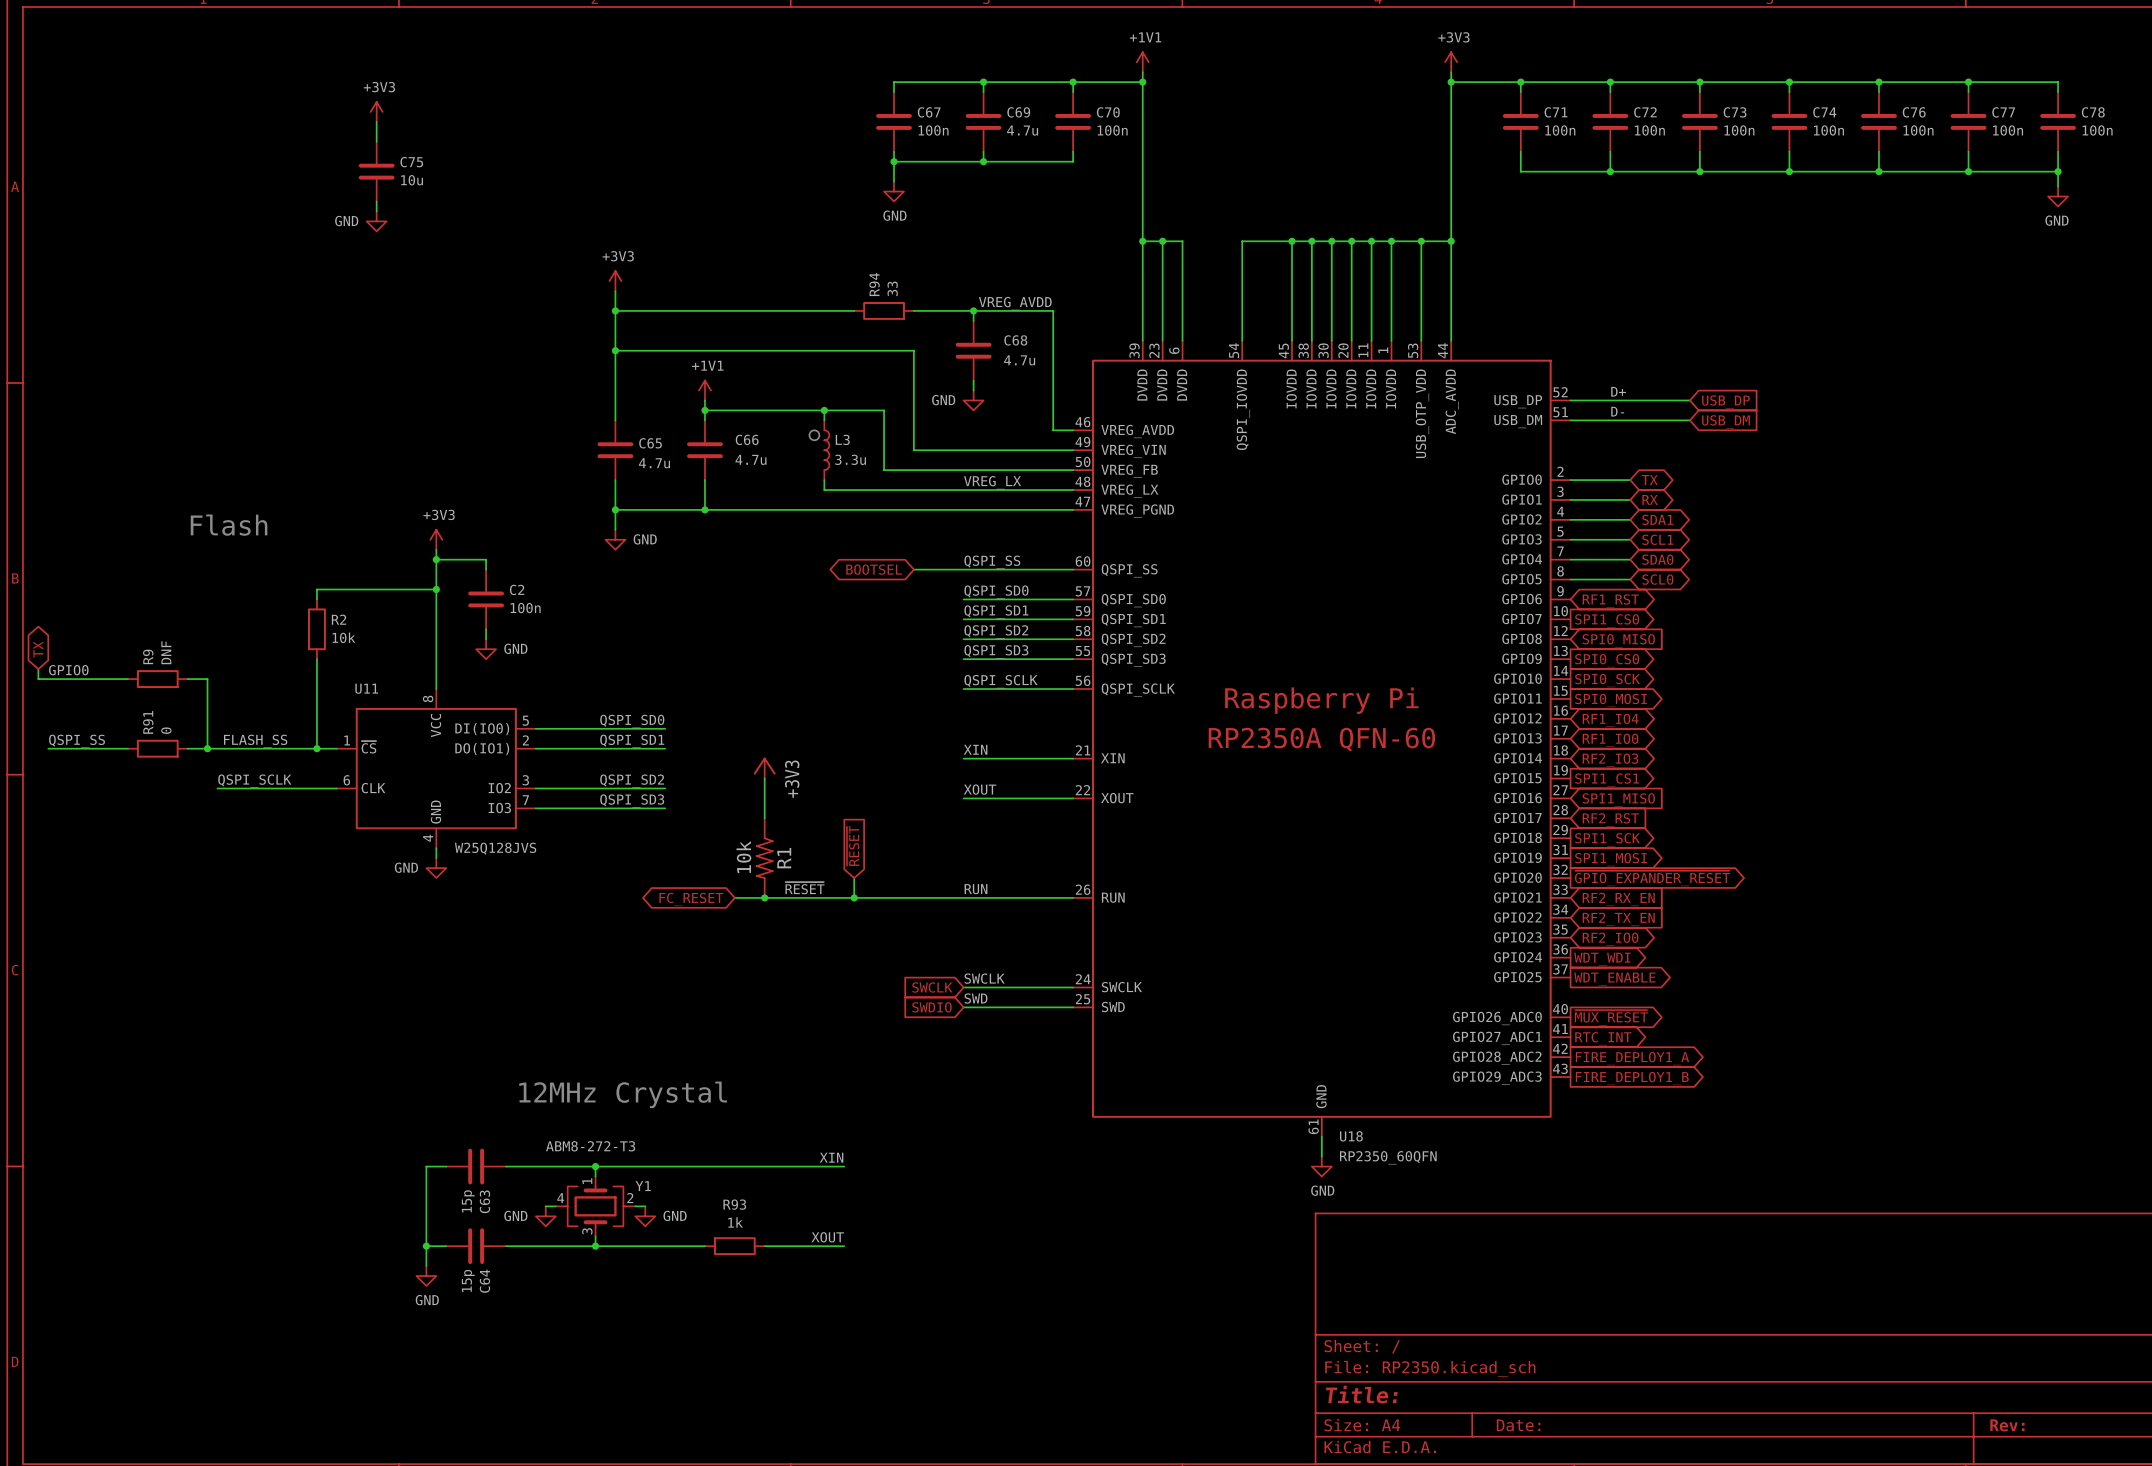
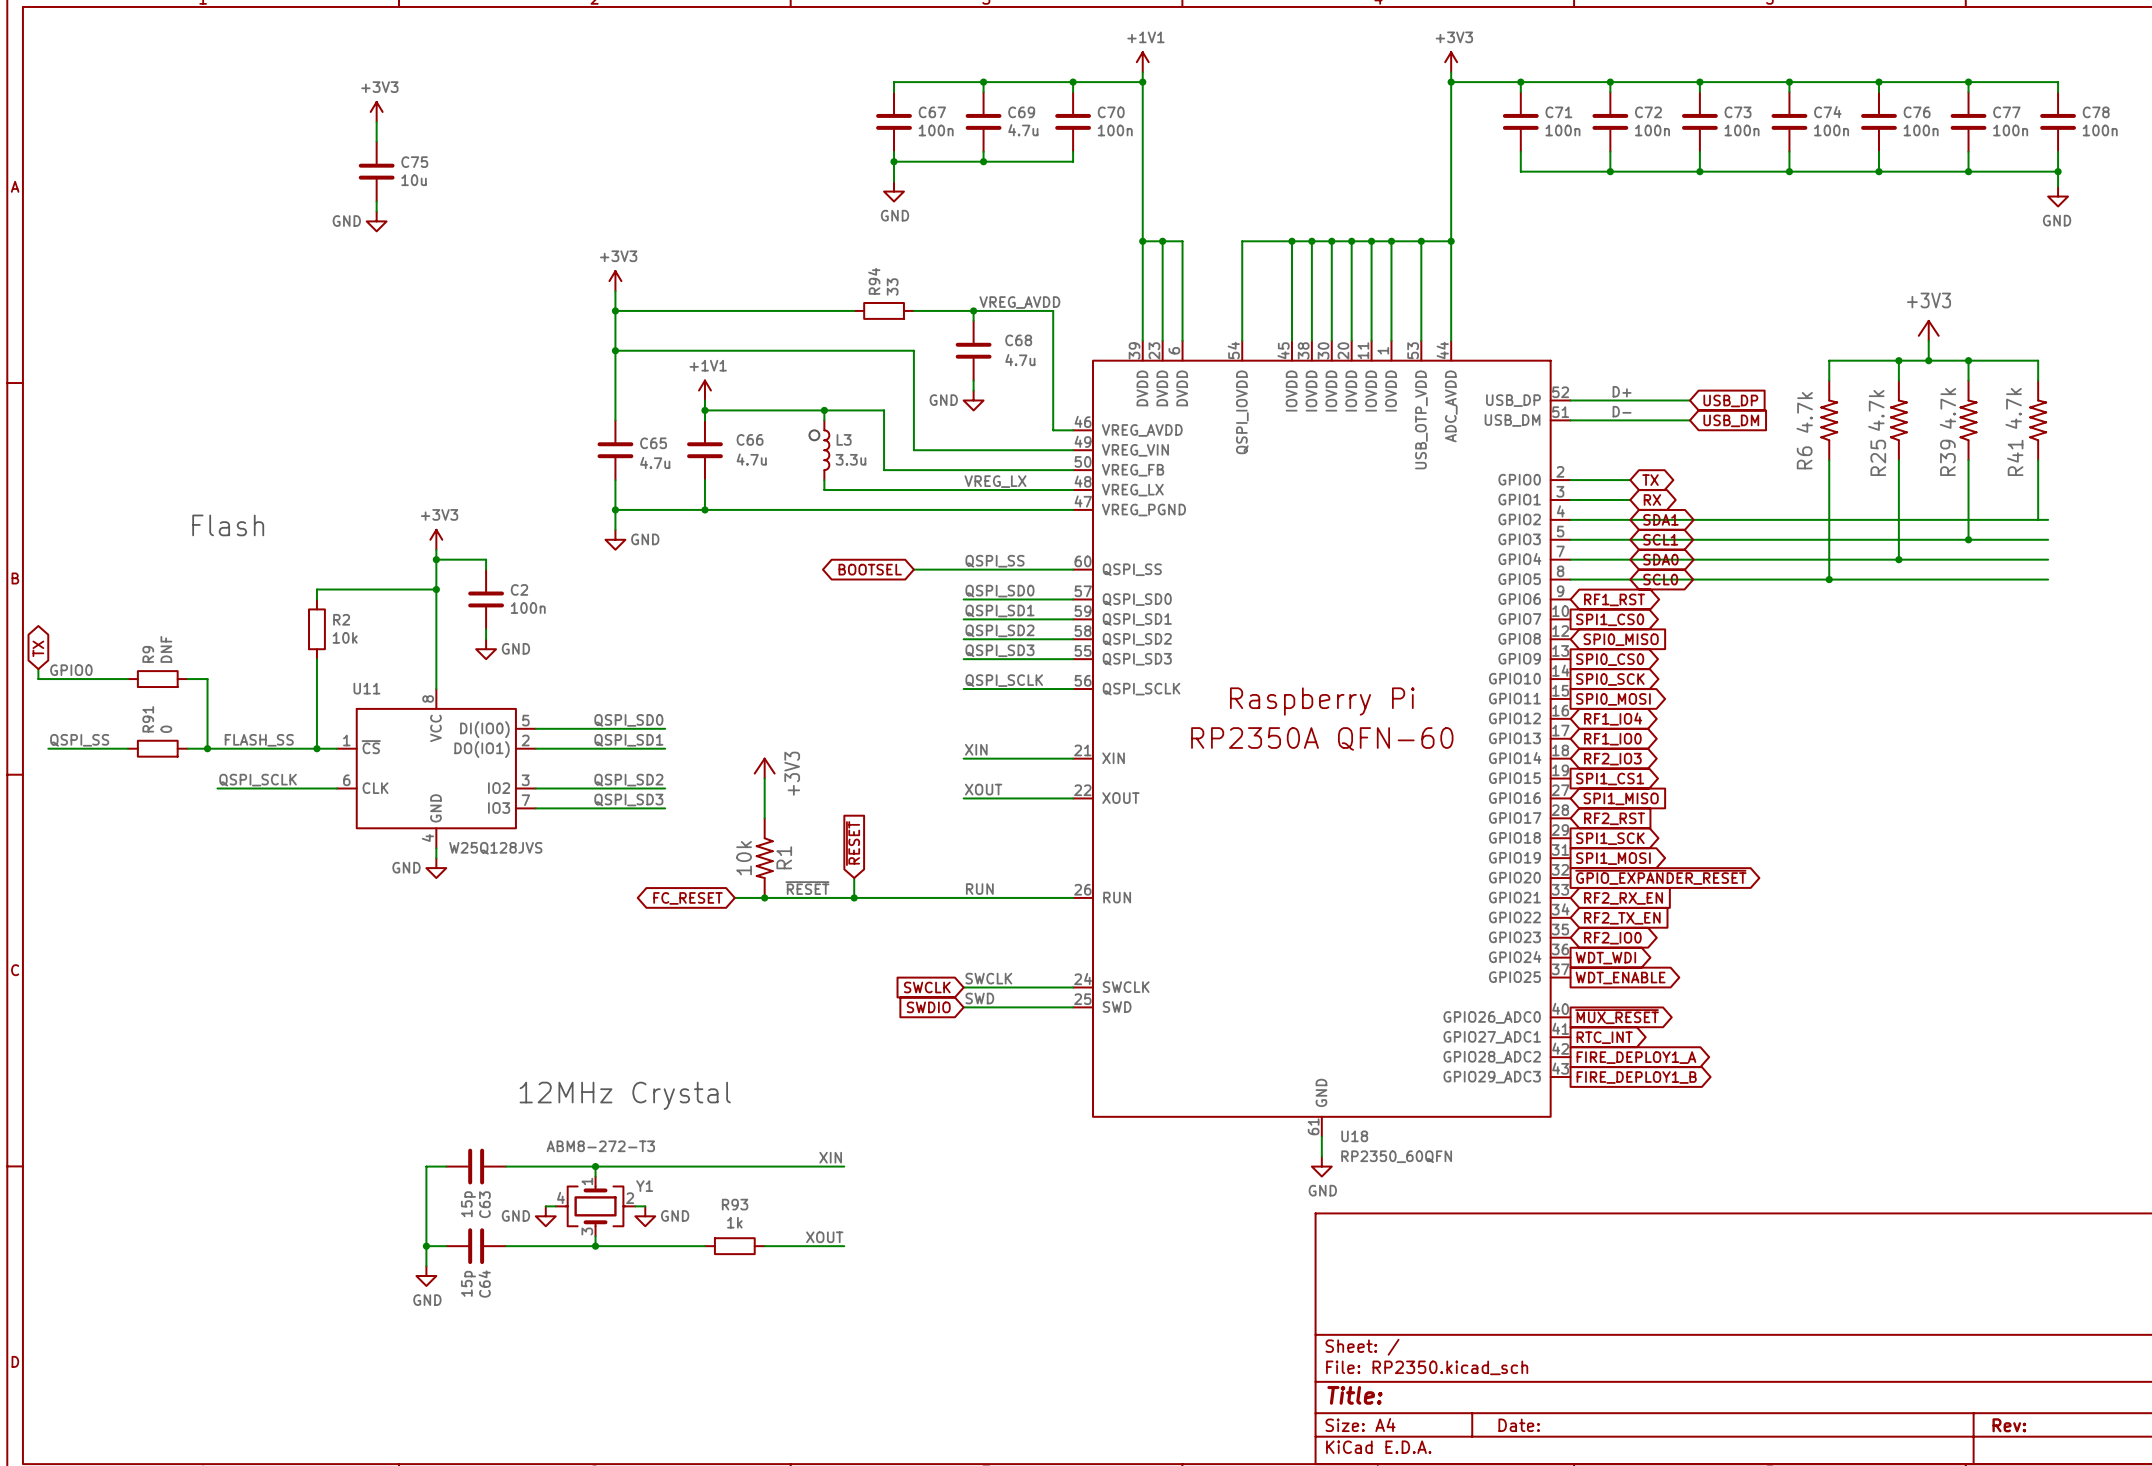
power symbol: none -> +3V3 (1928, 330)
wire: none -> (1928, 340) (1928, 360)
wire: none -> (1898, 360) (1898, 380)
junction: none -> (1898, 360)
junction: none -> (1928, 360)
wire: none -> (1968, 360) (1968, 380)
junction: none -> (1968, 360)
wire: none -> (1829, 380) (1829, 360) (2038, 360) (2038, 380)
R6: none -> 4.7k (1829, 420)
R25: none -> 4.7k (1898, 420)
R39: none -> 4.7k (1968, 420)
R41: none -> 4.7k (2038, 420)
wire: none -> (1829, 460) (1829, 579)
wire: none -> (1898, 460) (1898, 559)
wire: none -> (1968, 460) (1968, 539)
wire: none -> (2038, 460) (2038, 519)
wire: none -> (1630, 519) (2048, 519)
wire: none -> (1630, 539) (2048, 539)
junction: none -> (1968, 539)
wire: none -> (1630, 559) (2048, 559)
junction: none -> (1898, 559)
wire: none -> (1630, 579) (2048, 579)
junction: none -> (1829, 579)

